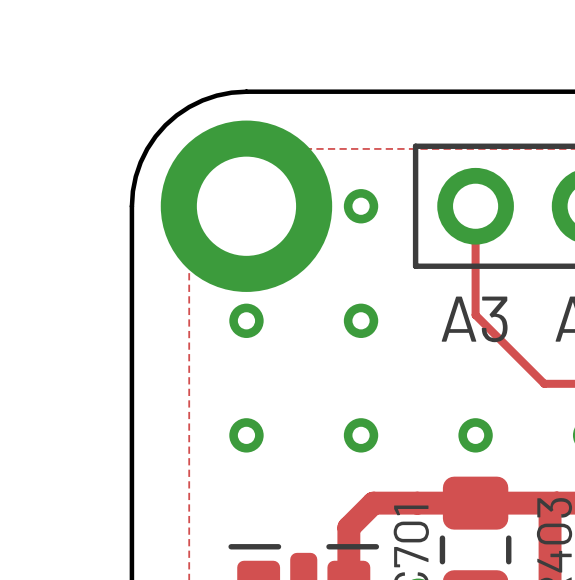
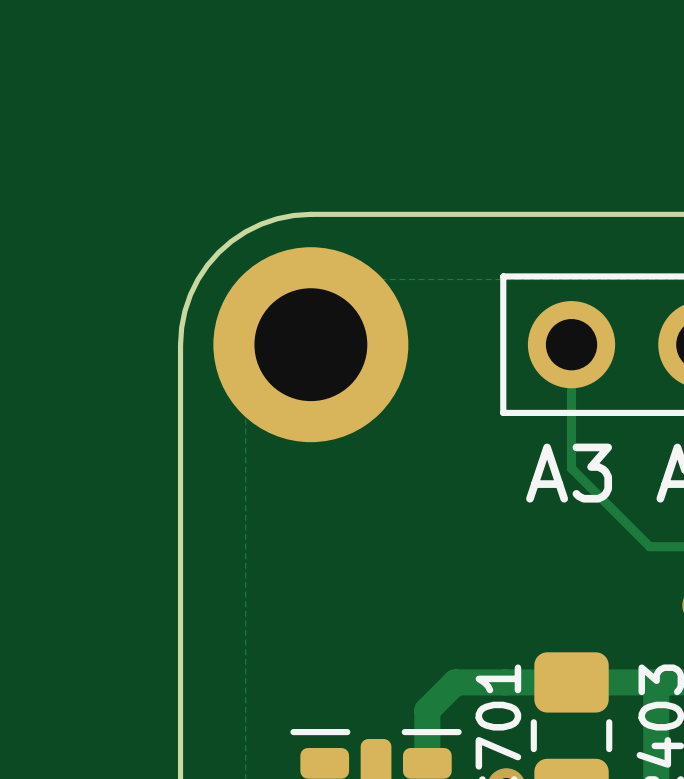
via: (361, 206) -> none
via: (246, 320) -> none
via: (361, 320) -> none
via: (246, 435) -> none
via: (361, 435) -> none
via: (475, 435) -> none

